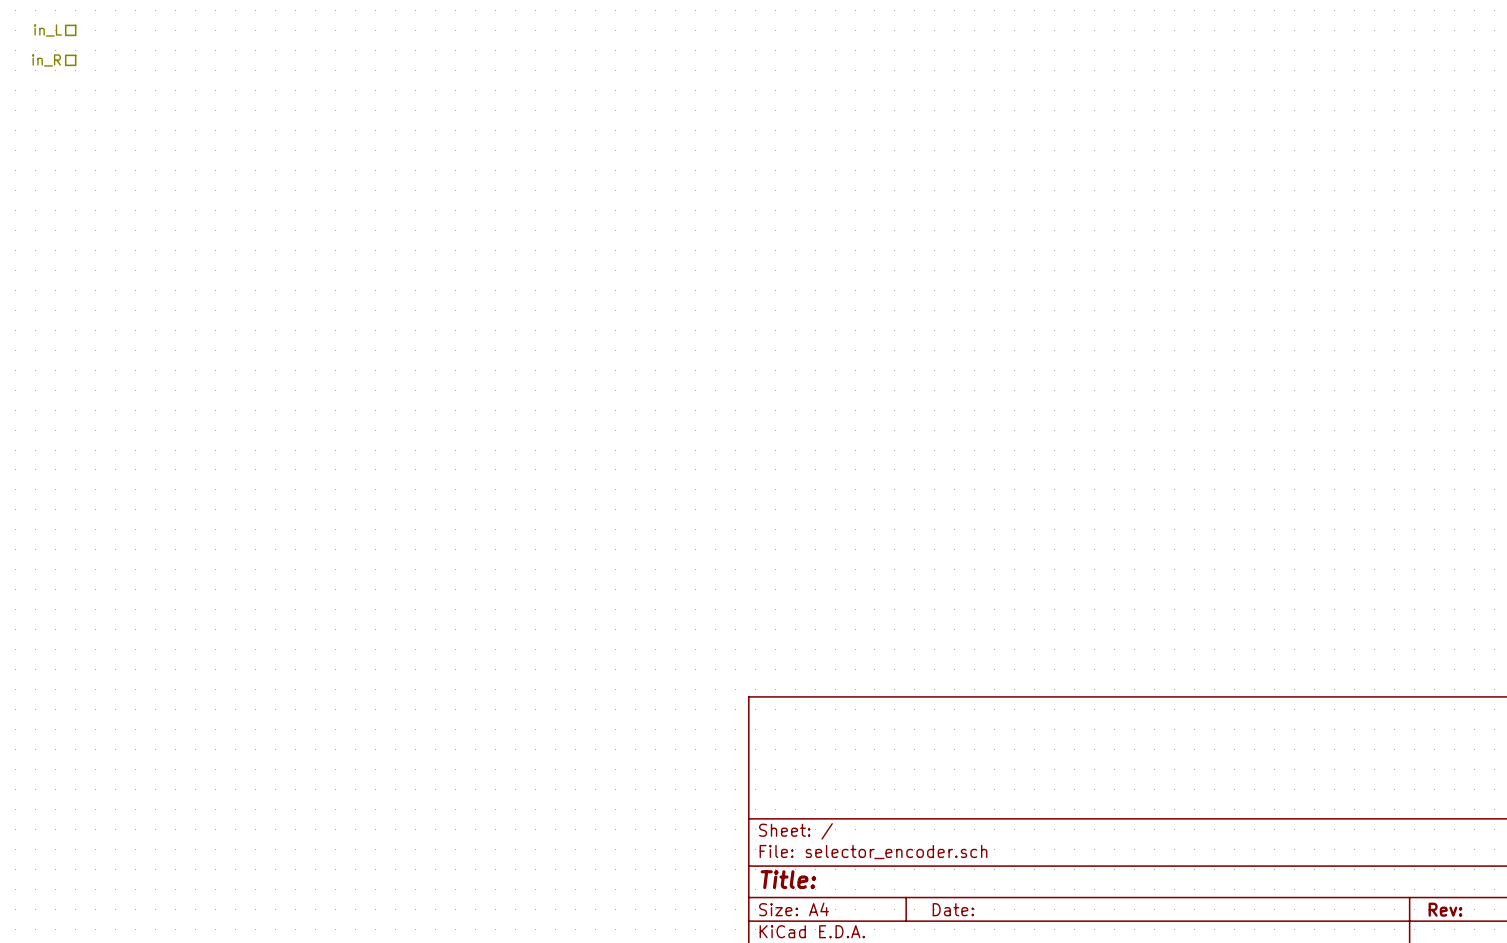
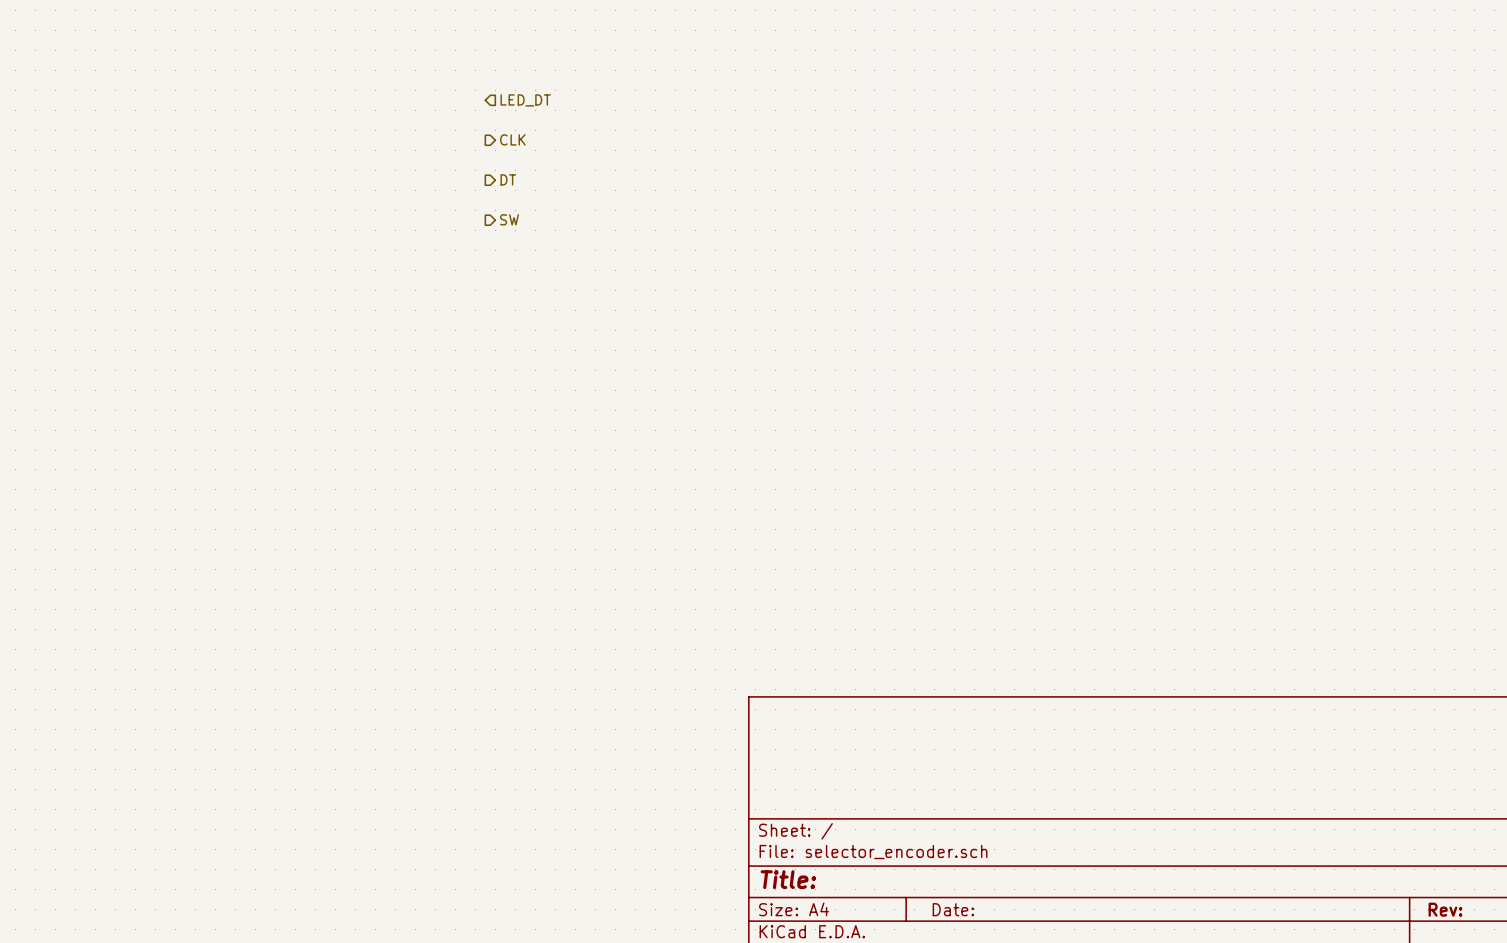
hierarchical label: in_L (47, 30) -> none
hierarchical label: in_R (46, 60) -> none
hierarchical label: none -> LED_DT (525, 100)
hierarchical label: none -> CLK (512, 139)
hierarchical label: none -> DT (508, 179)
hierarchical label: none -> SW (509, 219)

